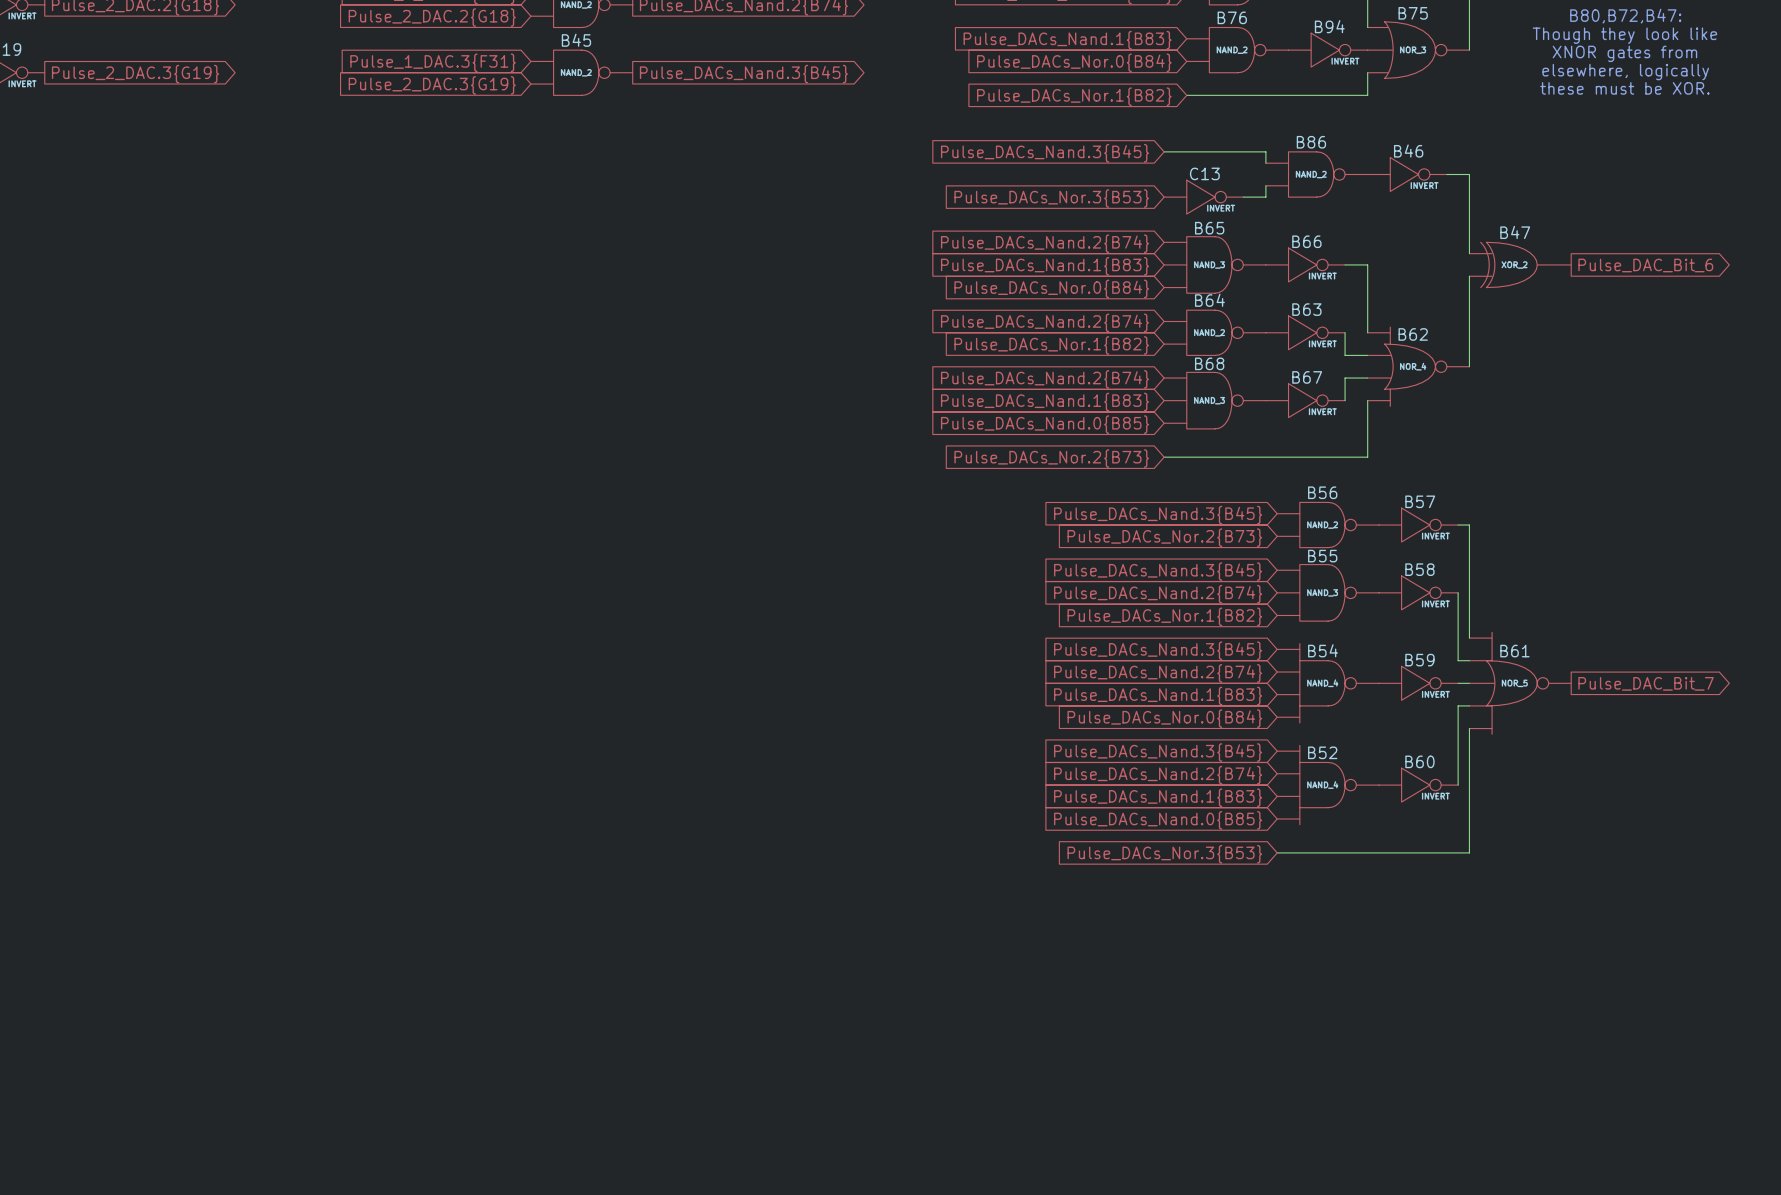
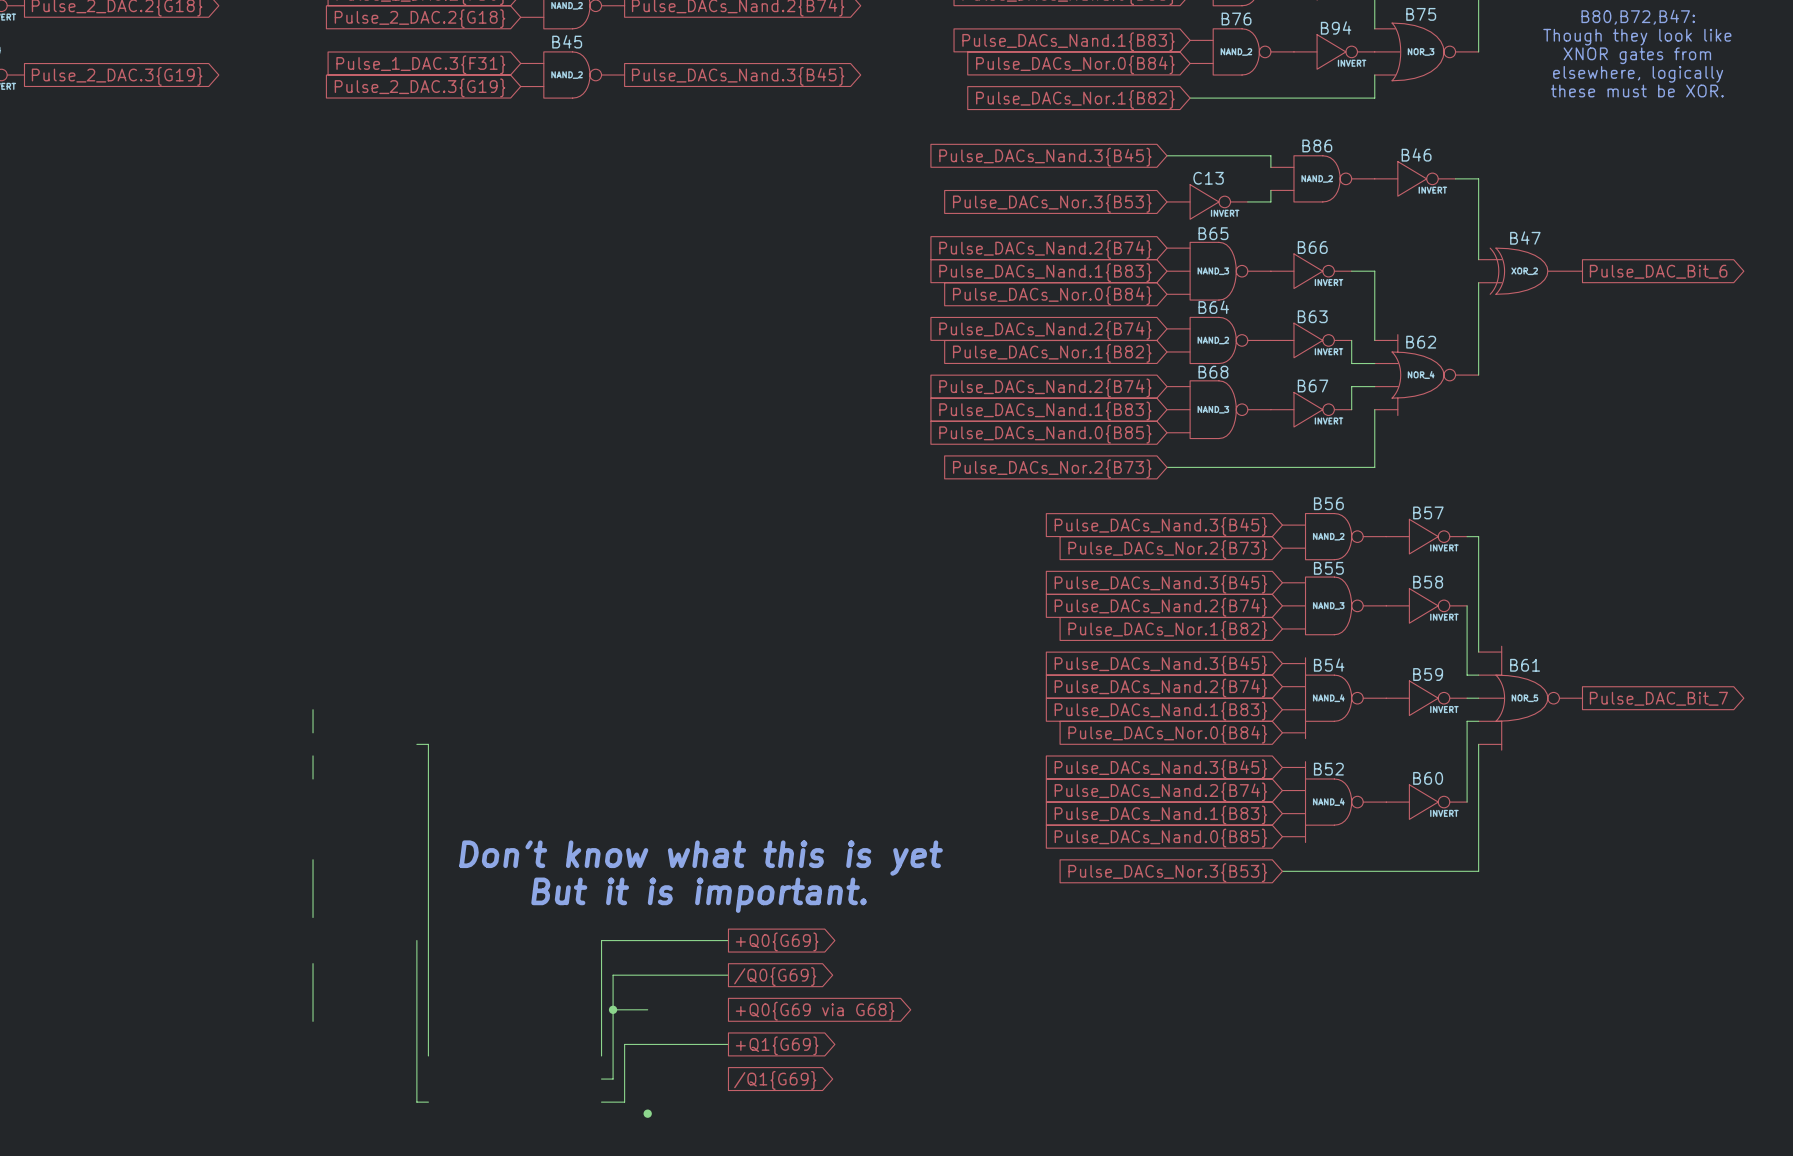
wire: none -> (313, 709) (313, 732)
wire: none -> (416, 744) (428, 744) (428, 1055)
wire: none -> (313, 755) (313, 778)
text: none -> Don't know what this is yet (701, 858)
wire: none -> (313, 859) (313, 917)
text: none -> But it is important. (699, 895)
wire: none -> (416, 940) (416, 1102) (428, 1102)
wire: none -> (728, 940) (601, 940) (601, 1055)
global label: none -> +Q0{G69} (777, 941)
wire: none -> (313, 963) (313, 1021)
wire: none -> (728, 975) (613, 975) (613, 1079) (601, 1079)
global label: none -> /Q0{G69} (775, 976)
wire: none -> (613, 1009) (647, 1009)
junction: none -> (613, 1009)
global label: none -> +Q0{G69 via G68} (815, 1011)
wire: none -> (728, 1044) (624, 1044) (624, 1102) (601, 1102)
global label: none -> +Q1{G69} (777, 1045)
global label: none -> /Q1{G69} (775, 1080)
junction: none -> (647, 1113)

